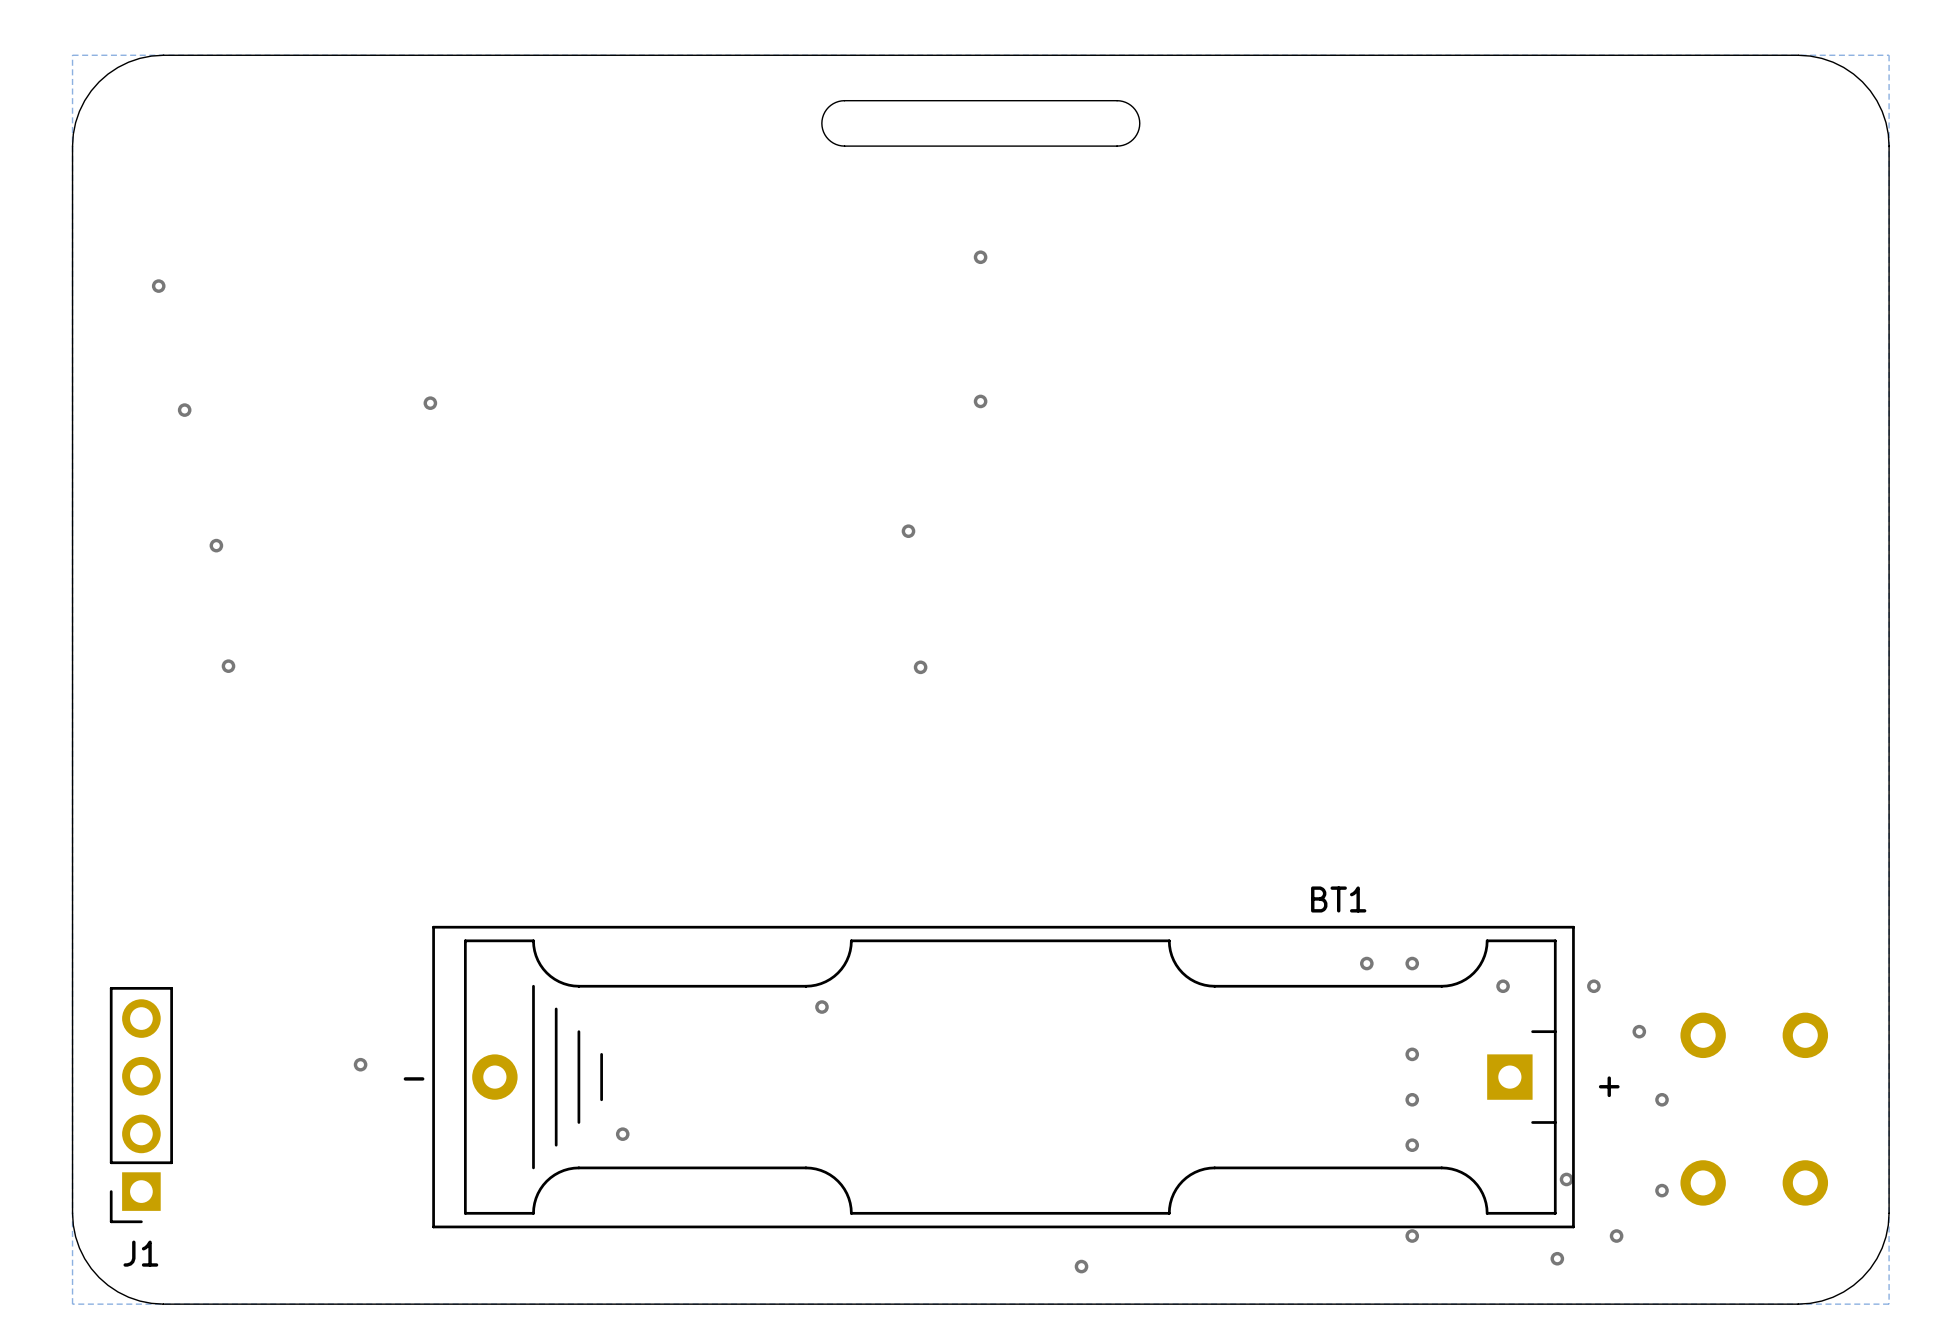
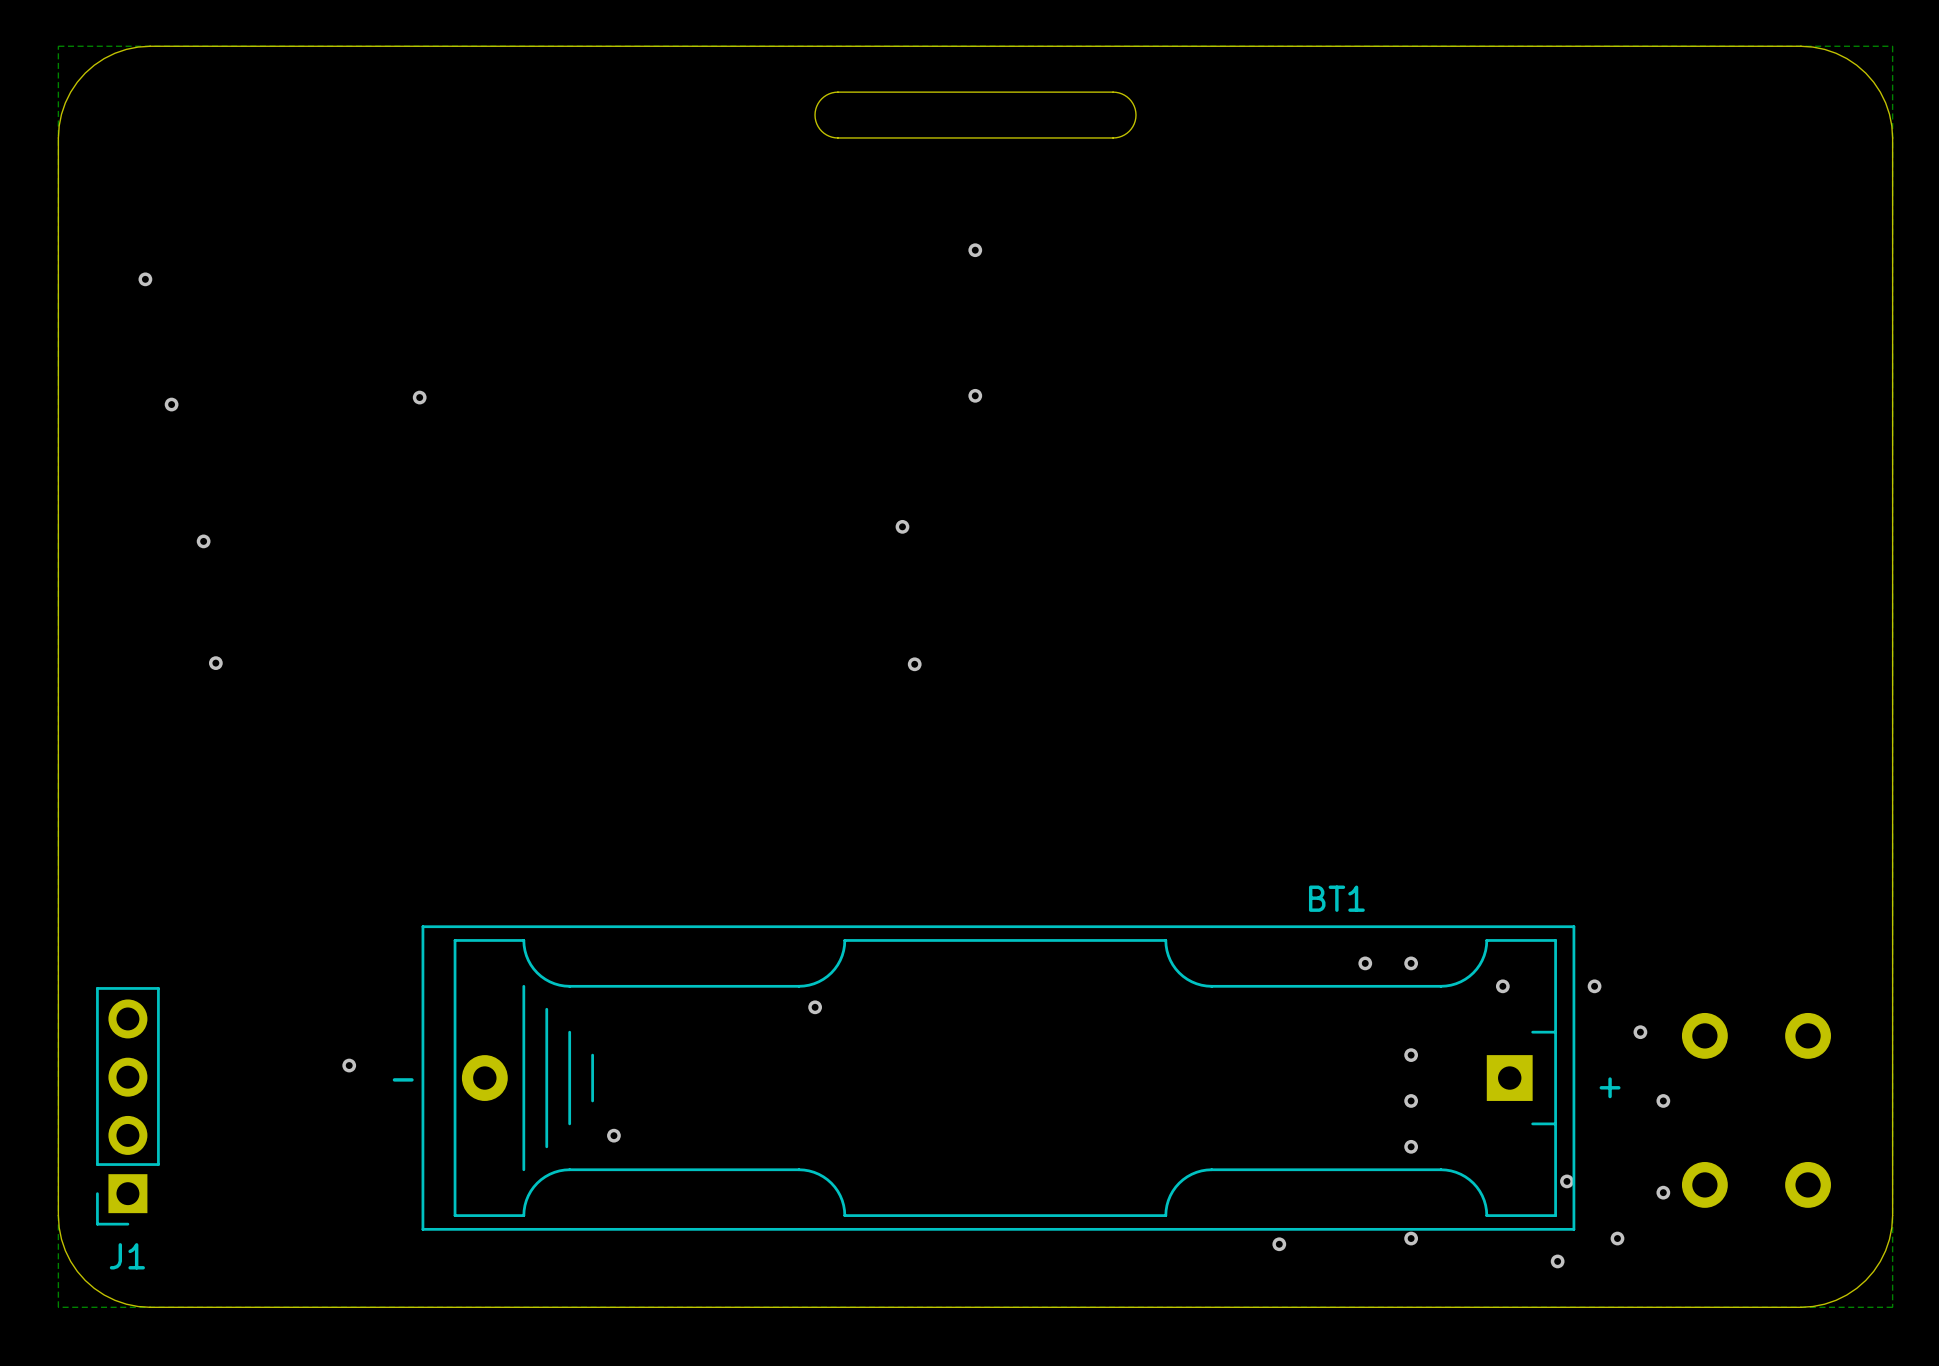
via: none -> (1279, 1244)
via: (1081, 1266) -> none

